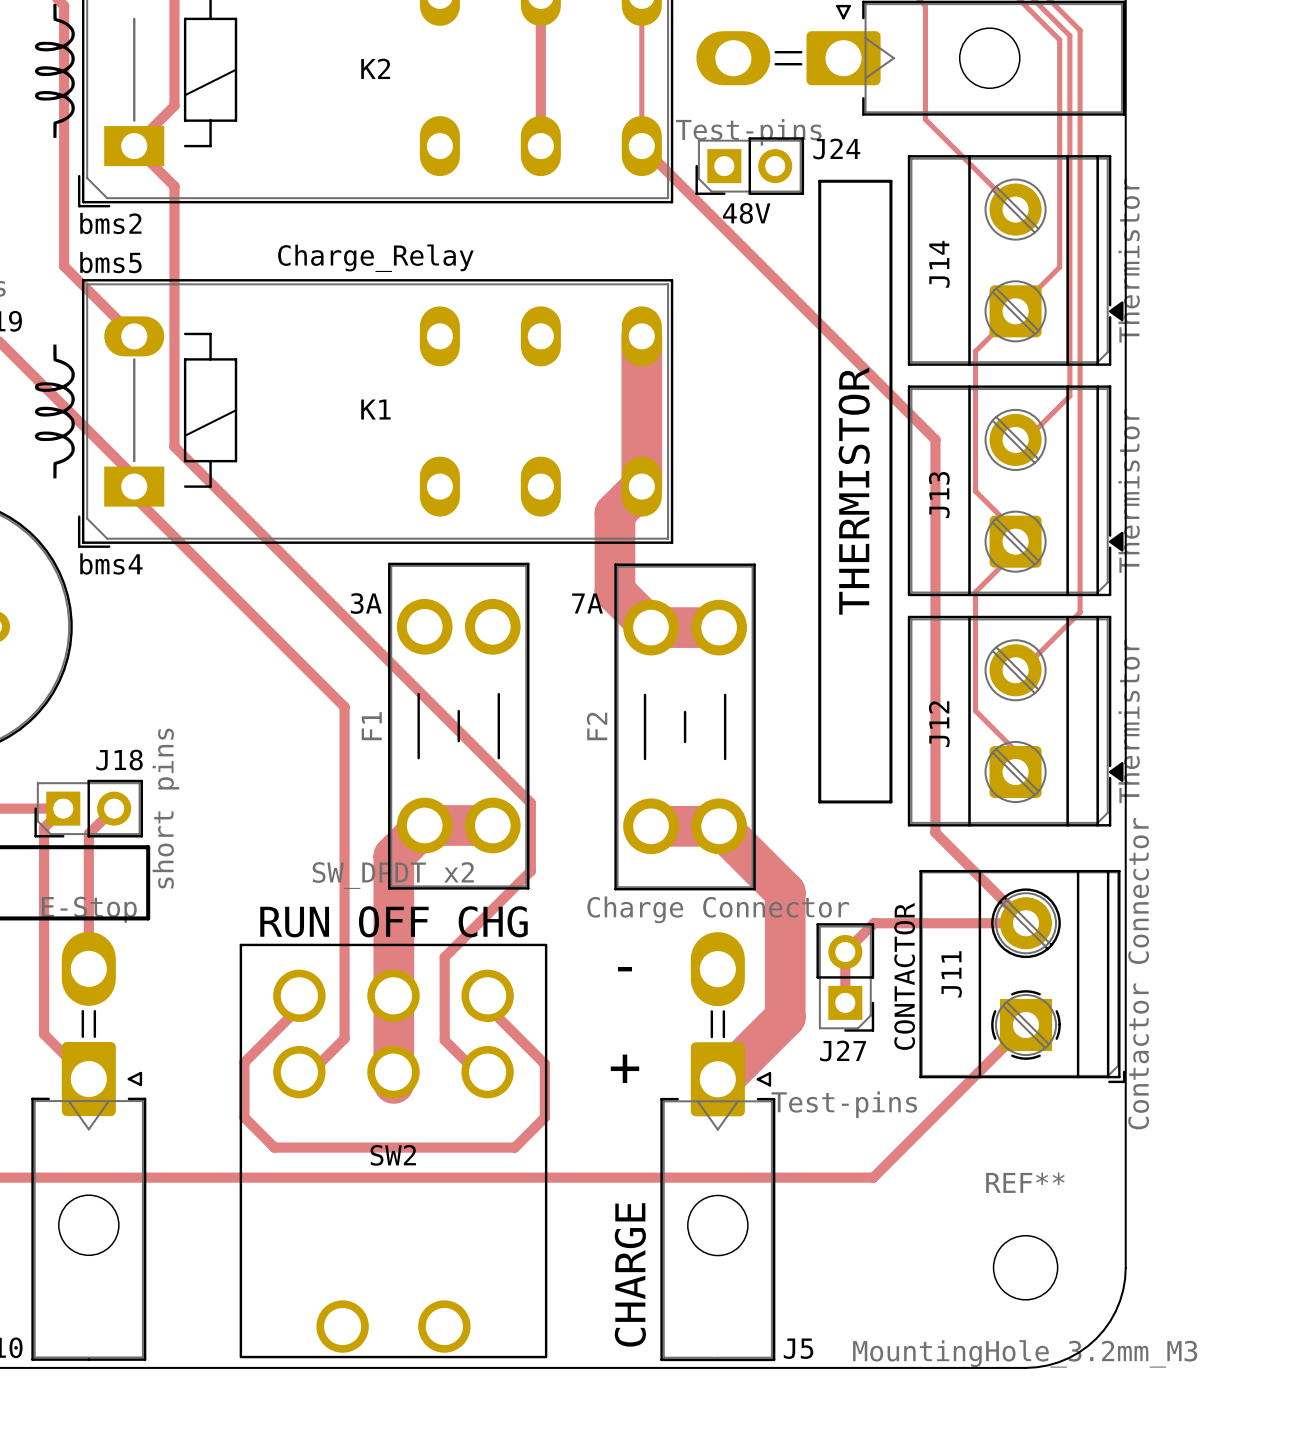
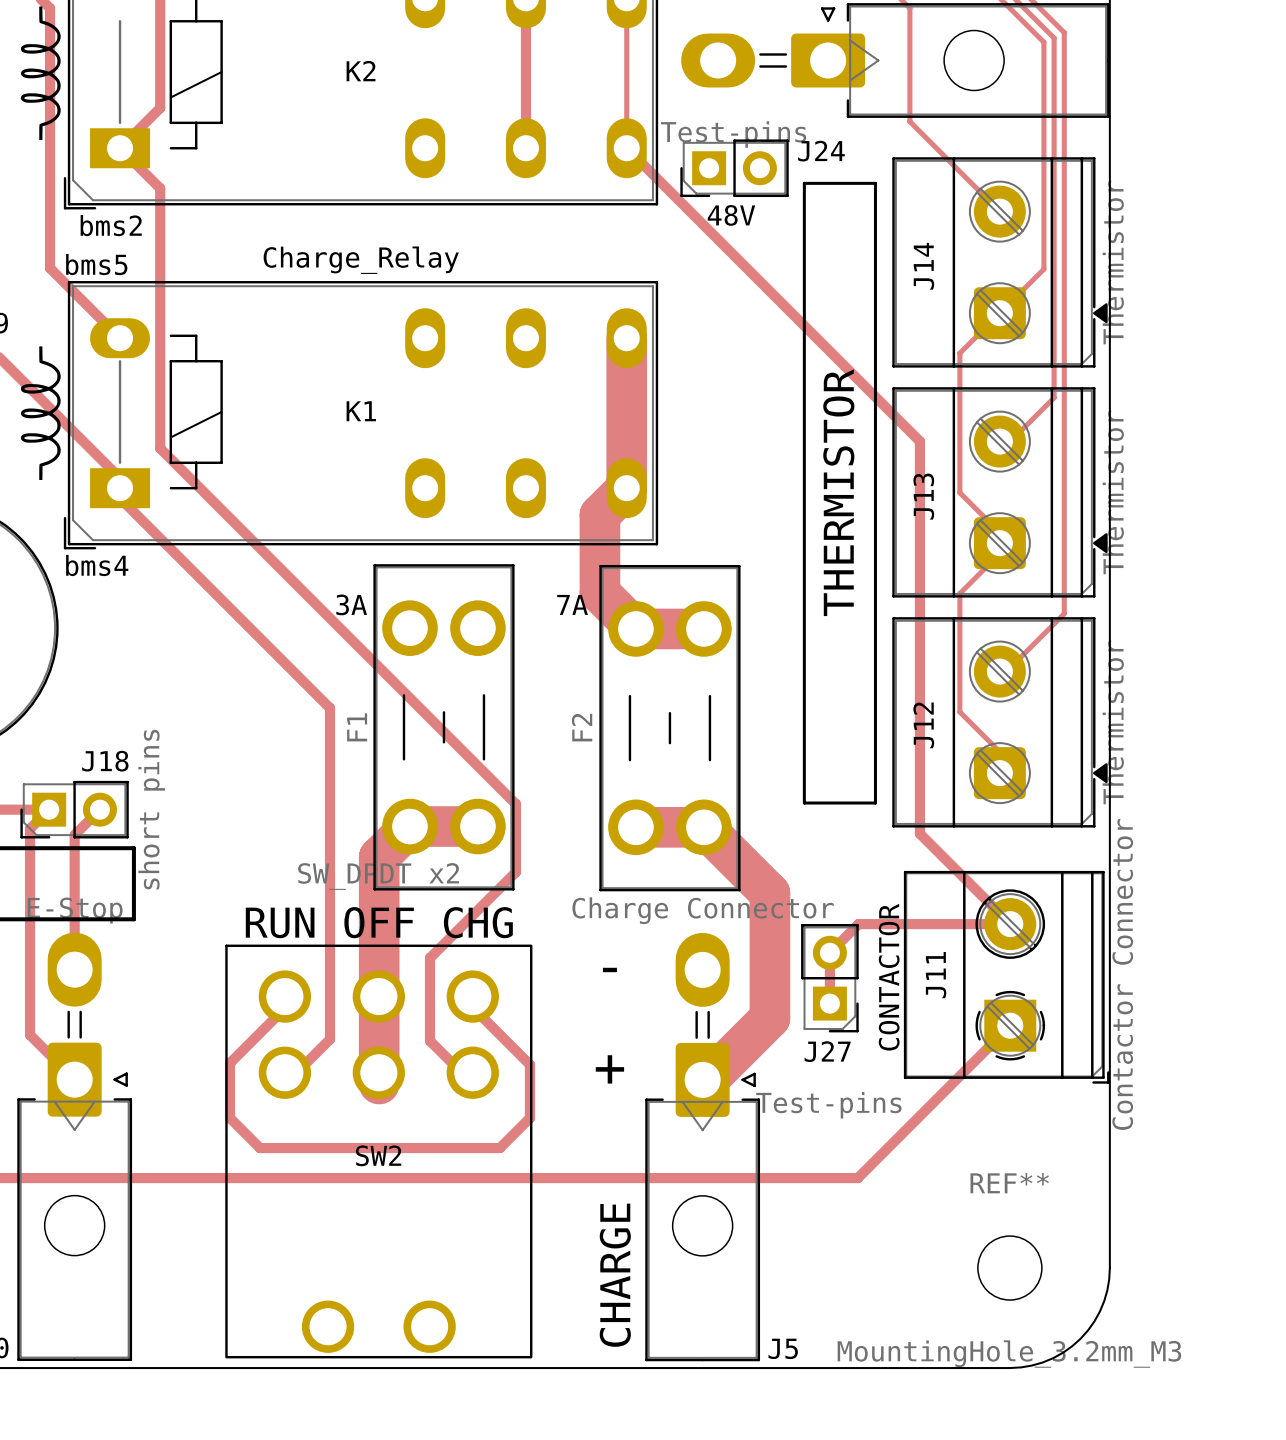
text position: bms2 (110, 223) -> bms2 (111, 225)

